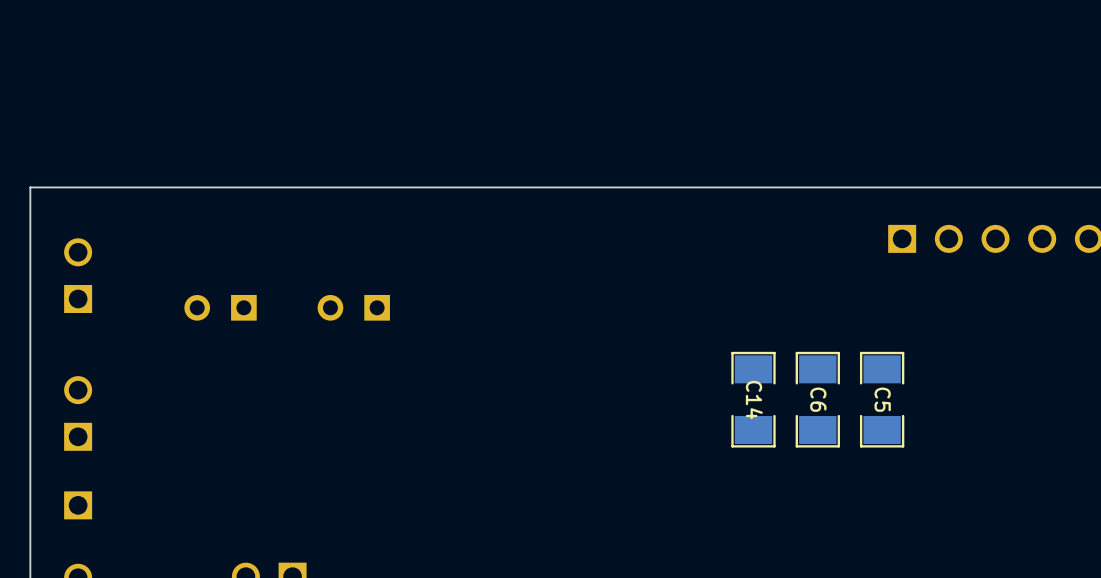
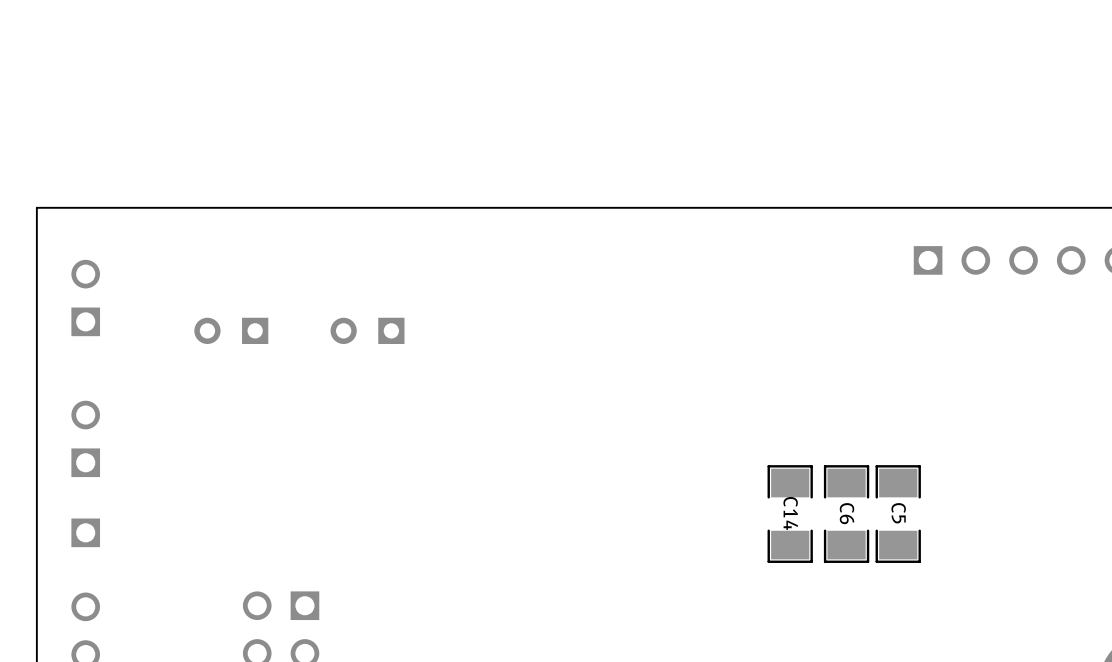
C14 position: (753, 399) -> (790, 514)
C6 position: (817, 399) -> (846, 514)
C5 position: (882, 399) -> (898, 514)

